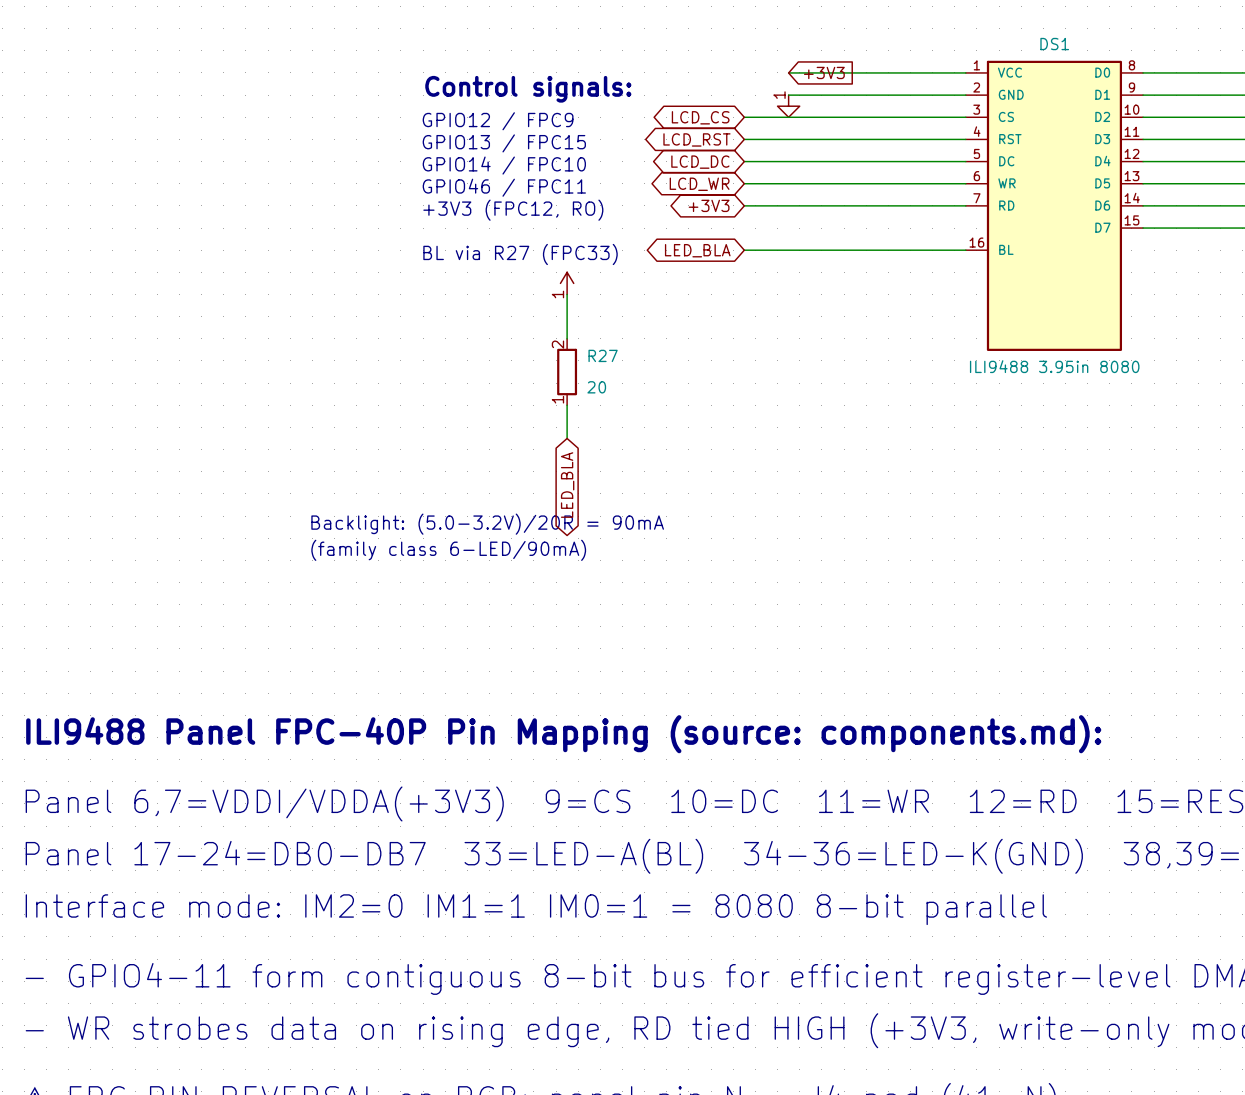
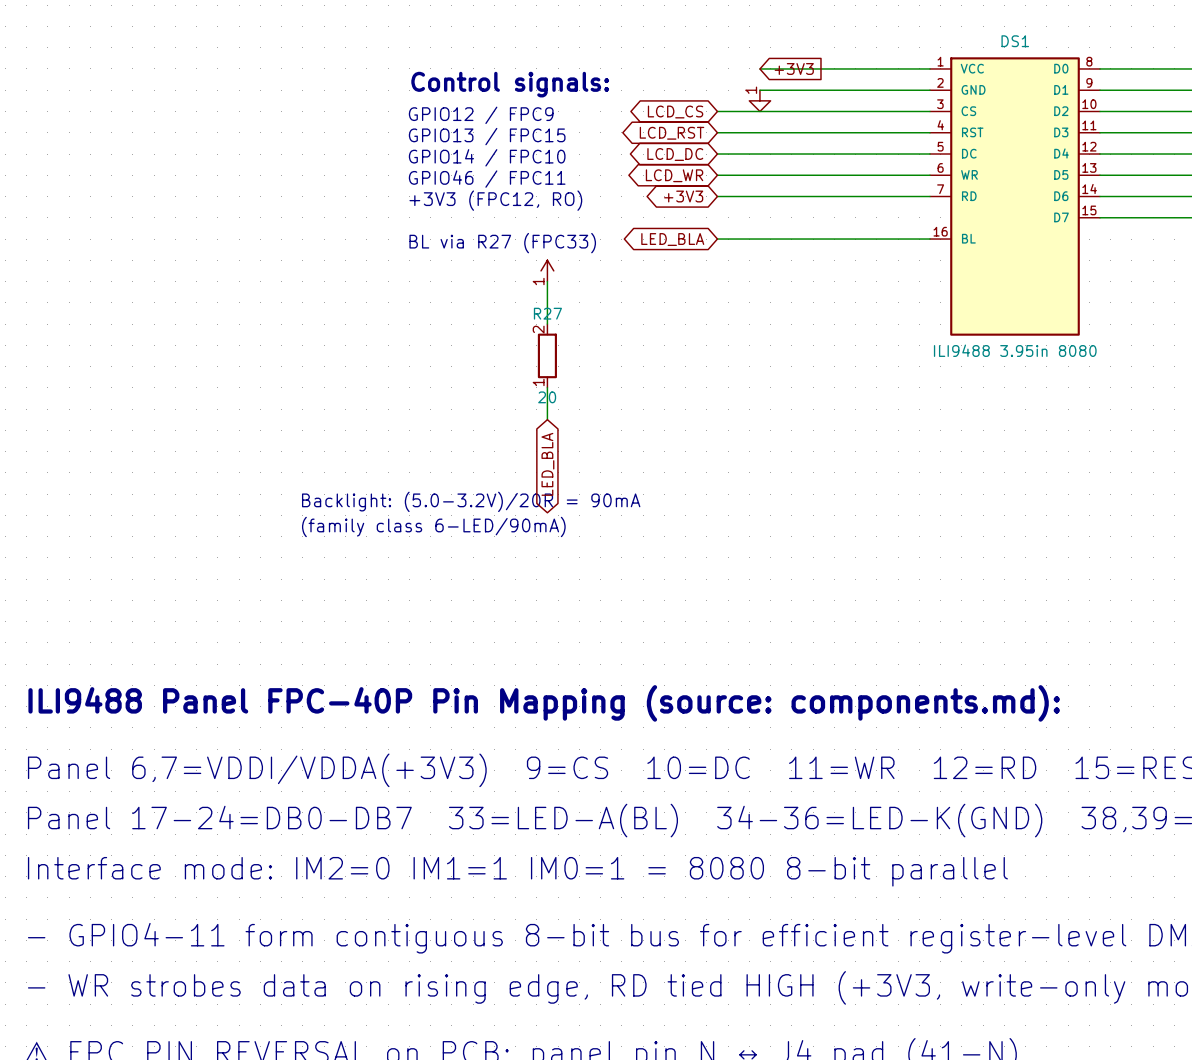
R27 name position: R27 (603, 355) -> R27 (547, 313)
R27 value position: 20 (596, 387) -> 20 (547, 397)

